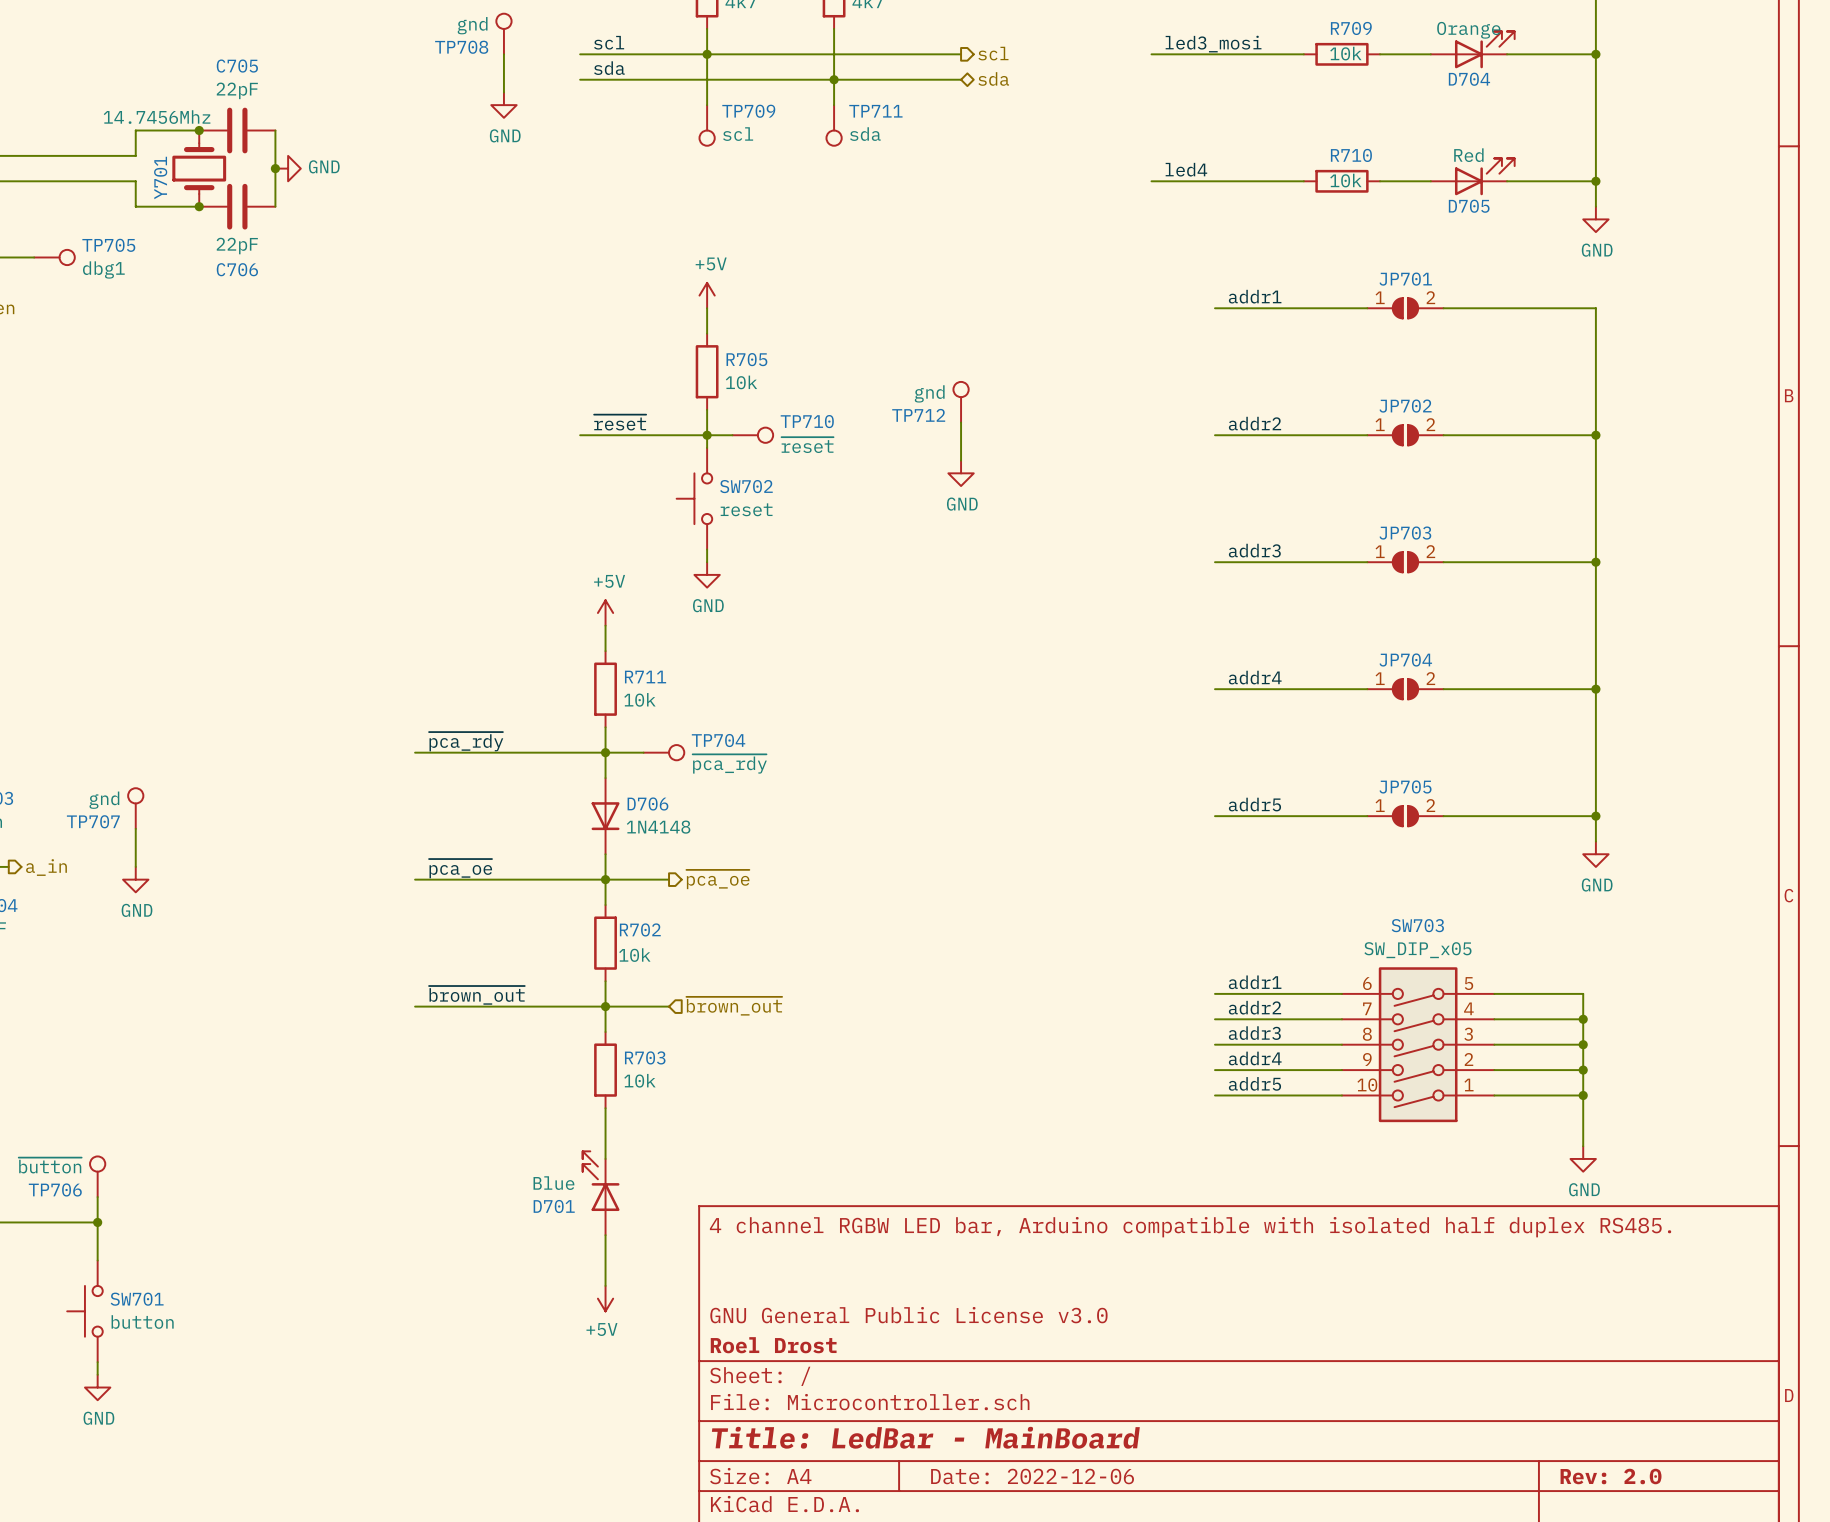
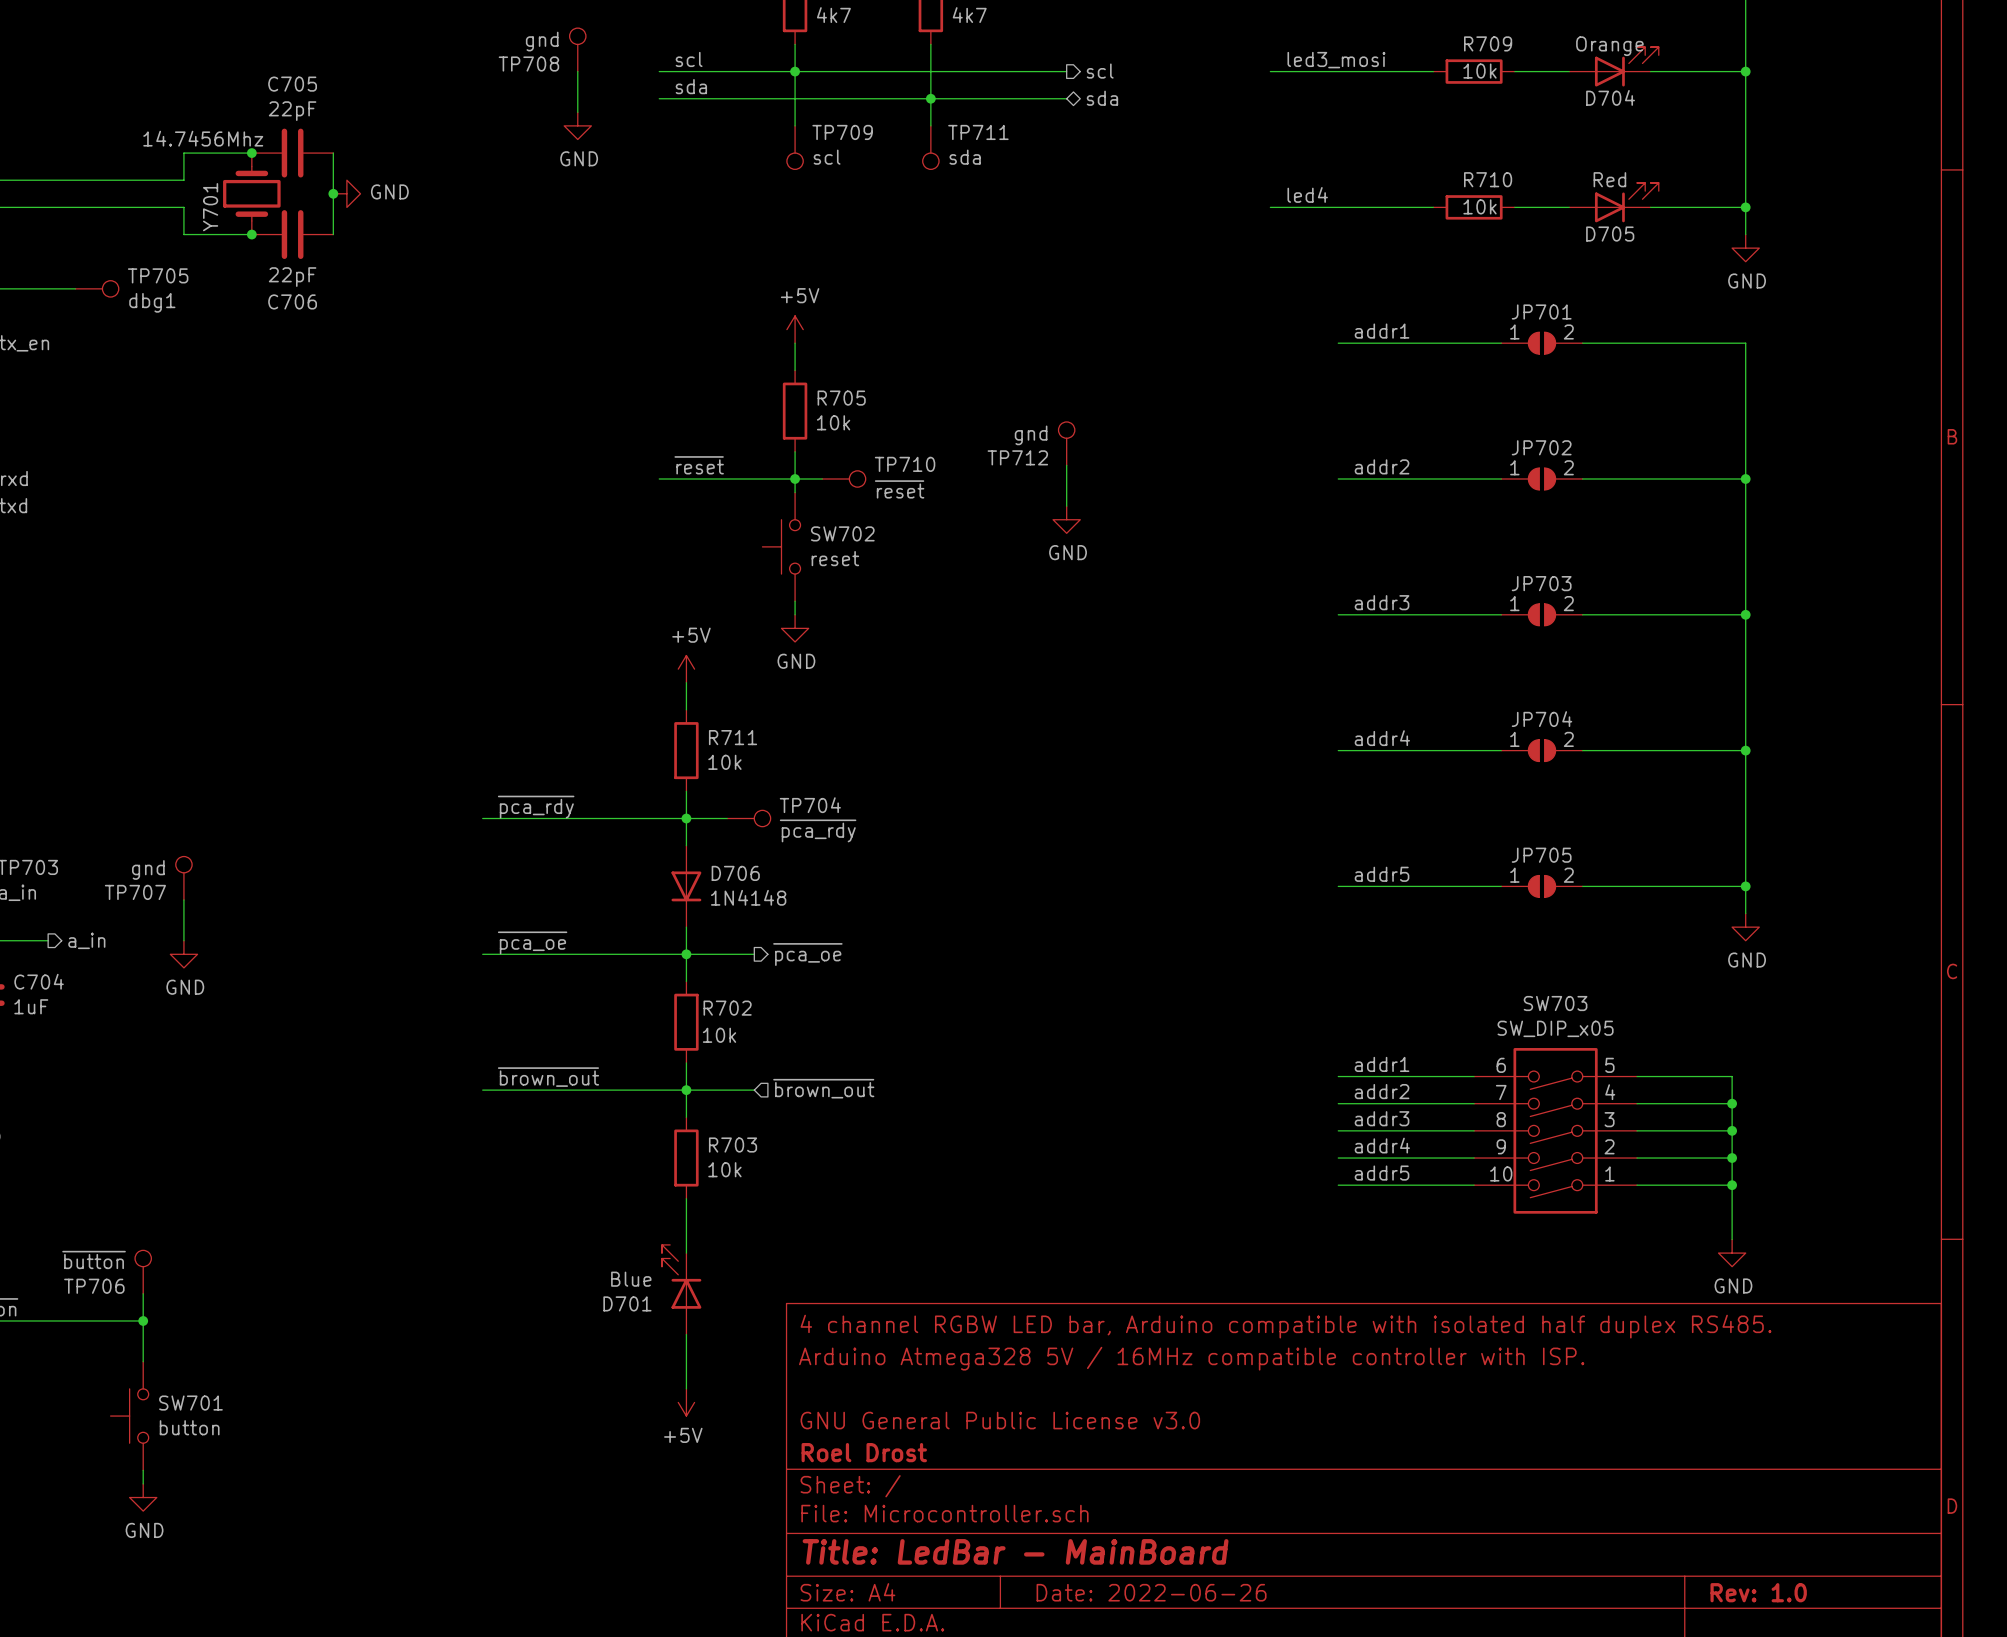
title block: none -> Arduino Atmega328 5V / 16MHz compatible controller with ISP. (1191, 1358)
title block: Date: 2022-12-06 (1032, 1476) -> Date: 2022-06-26 (1151, 1592)
title block: Rev: 2.0 (1611, 1476) -> Rev: 1.0 (1758, 1592)

